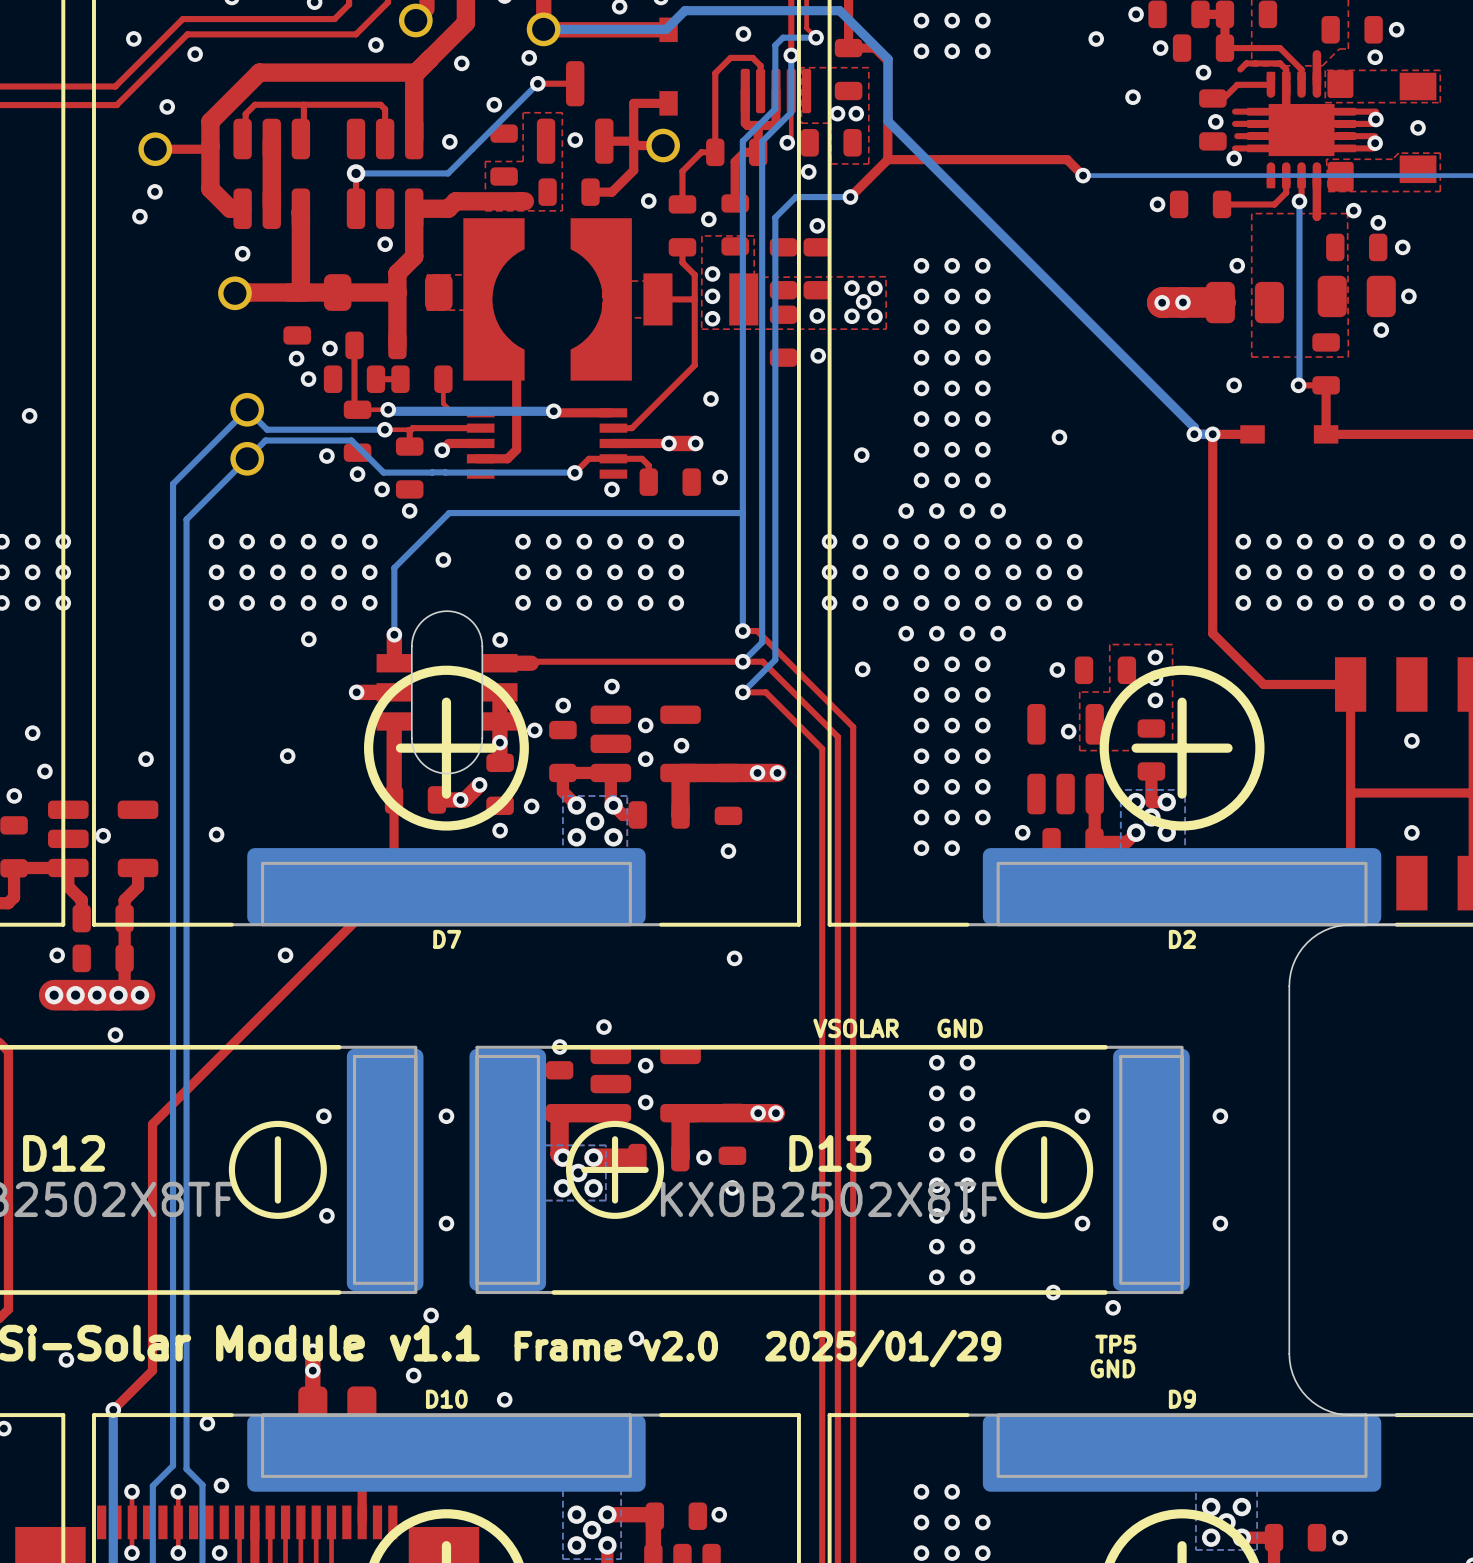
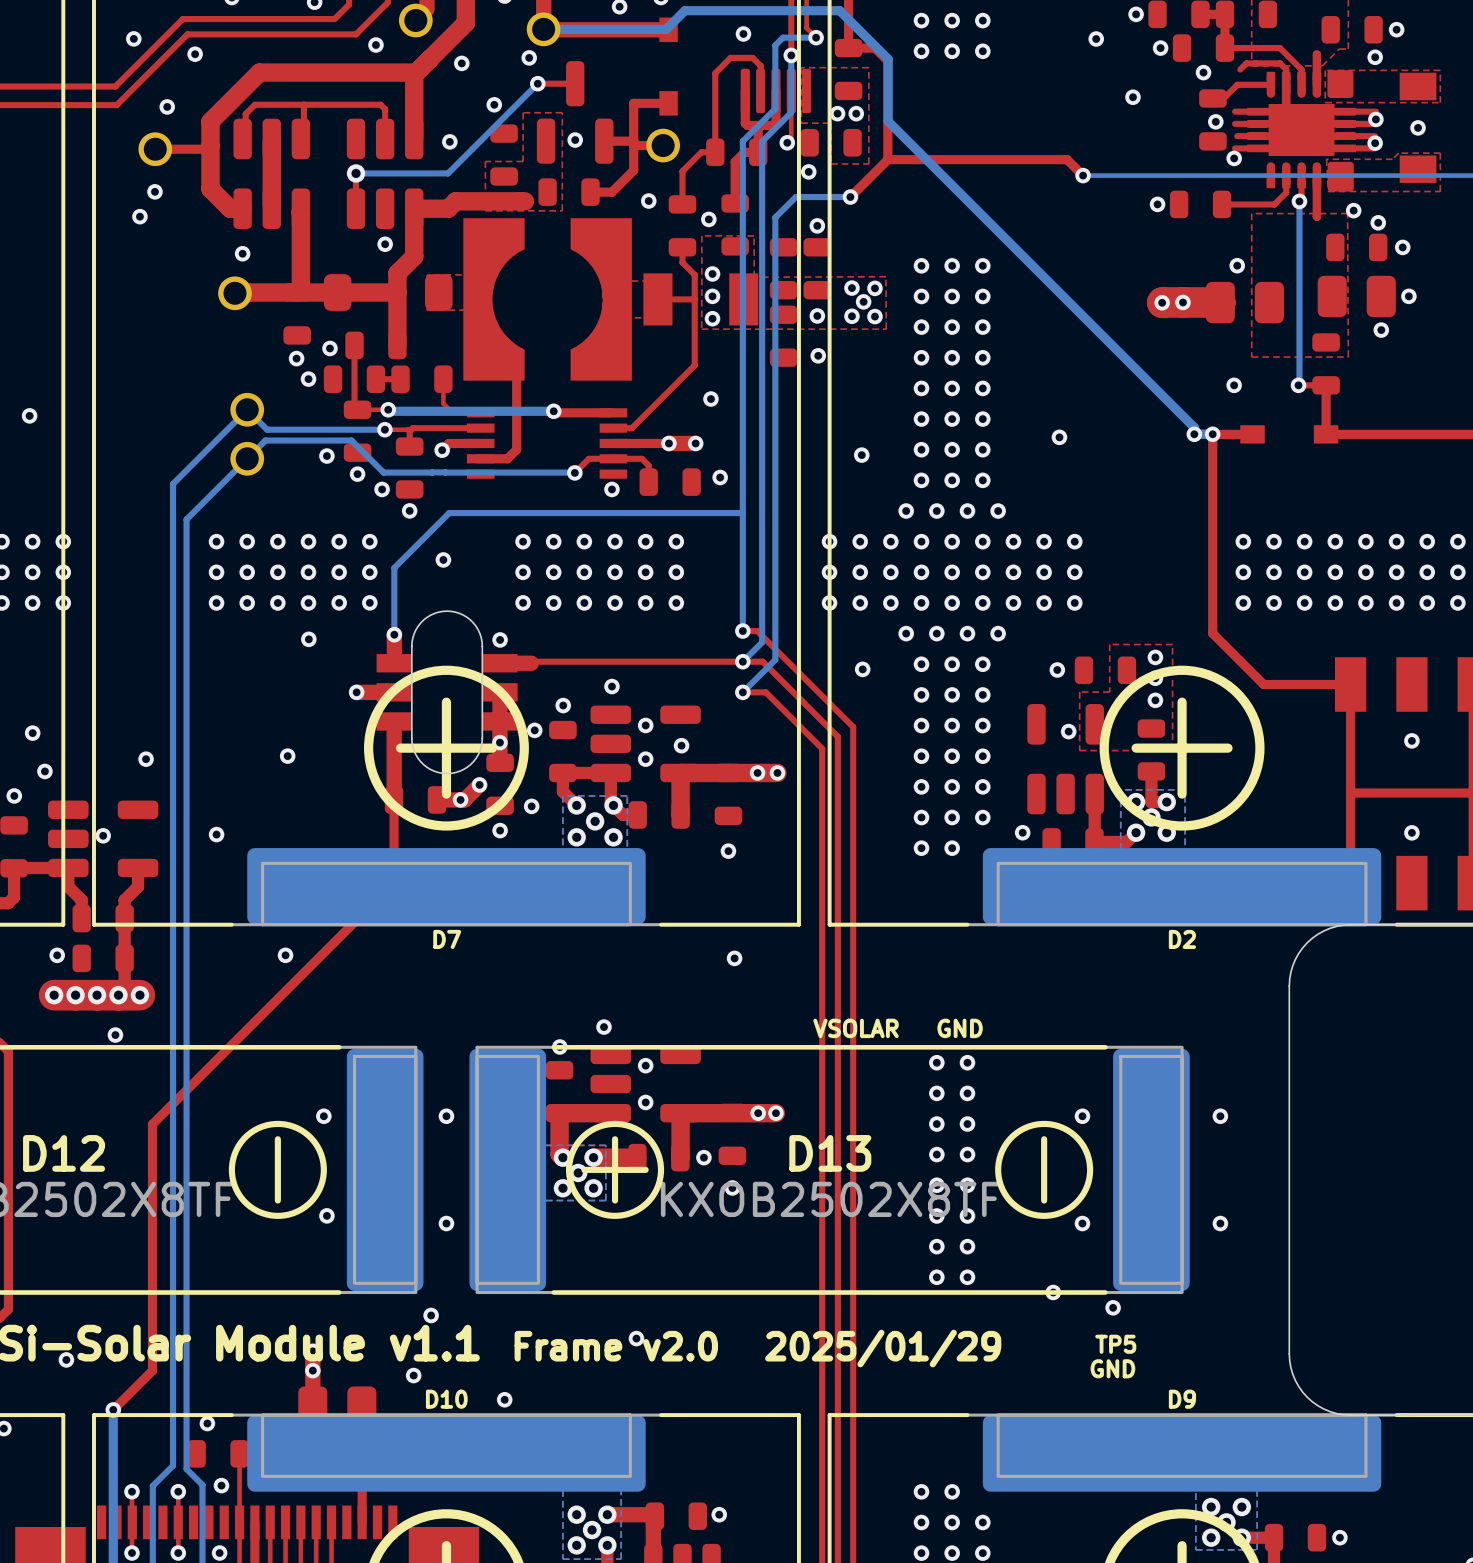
part: none -> (218, 1453)
top track: none -> (266, 1453) (239, 1453) (239, 1522)

